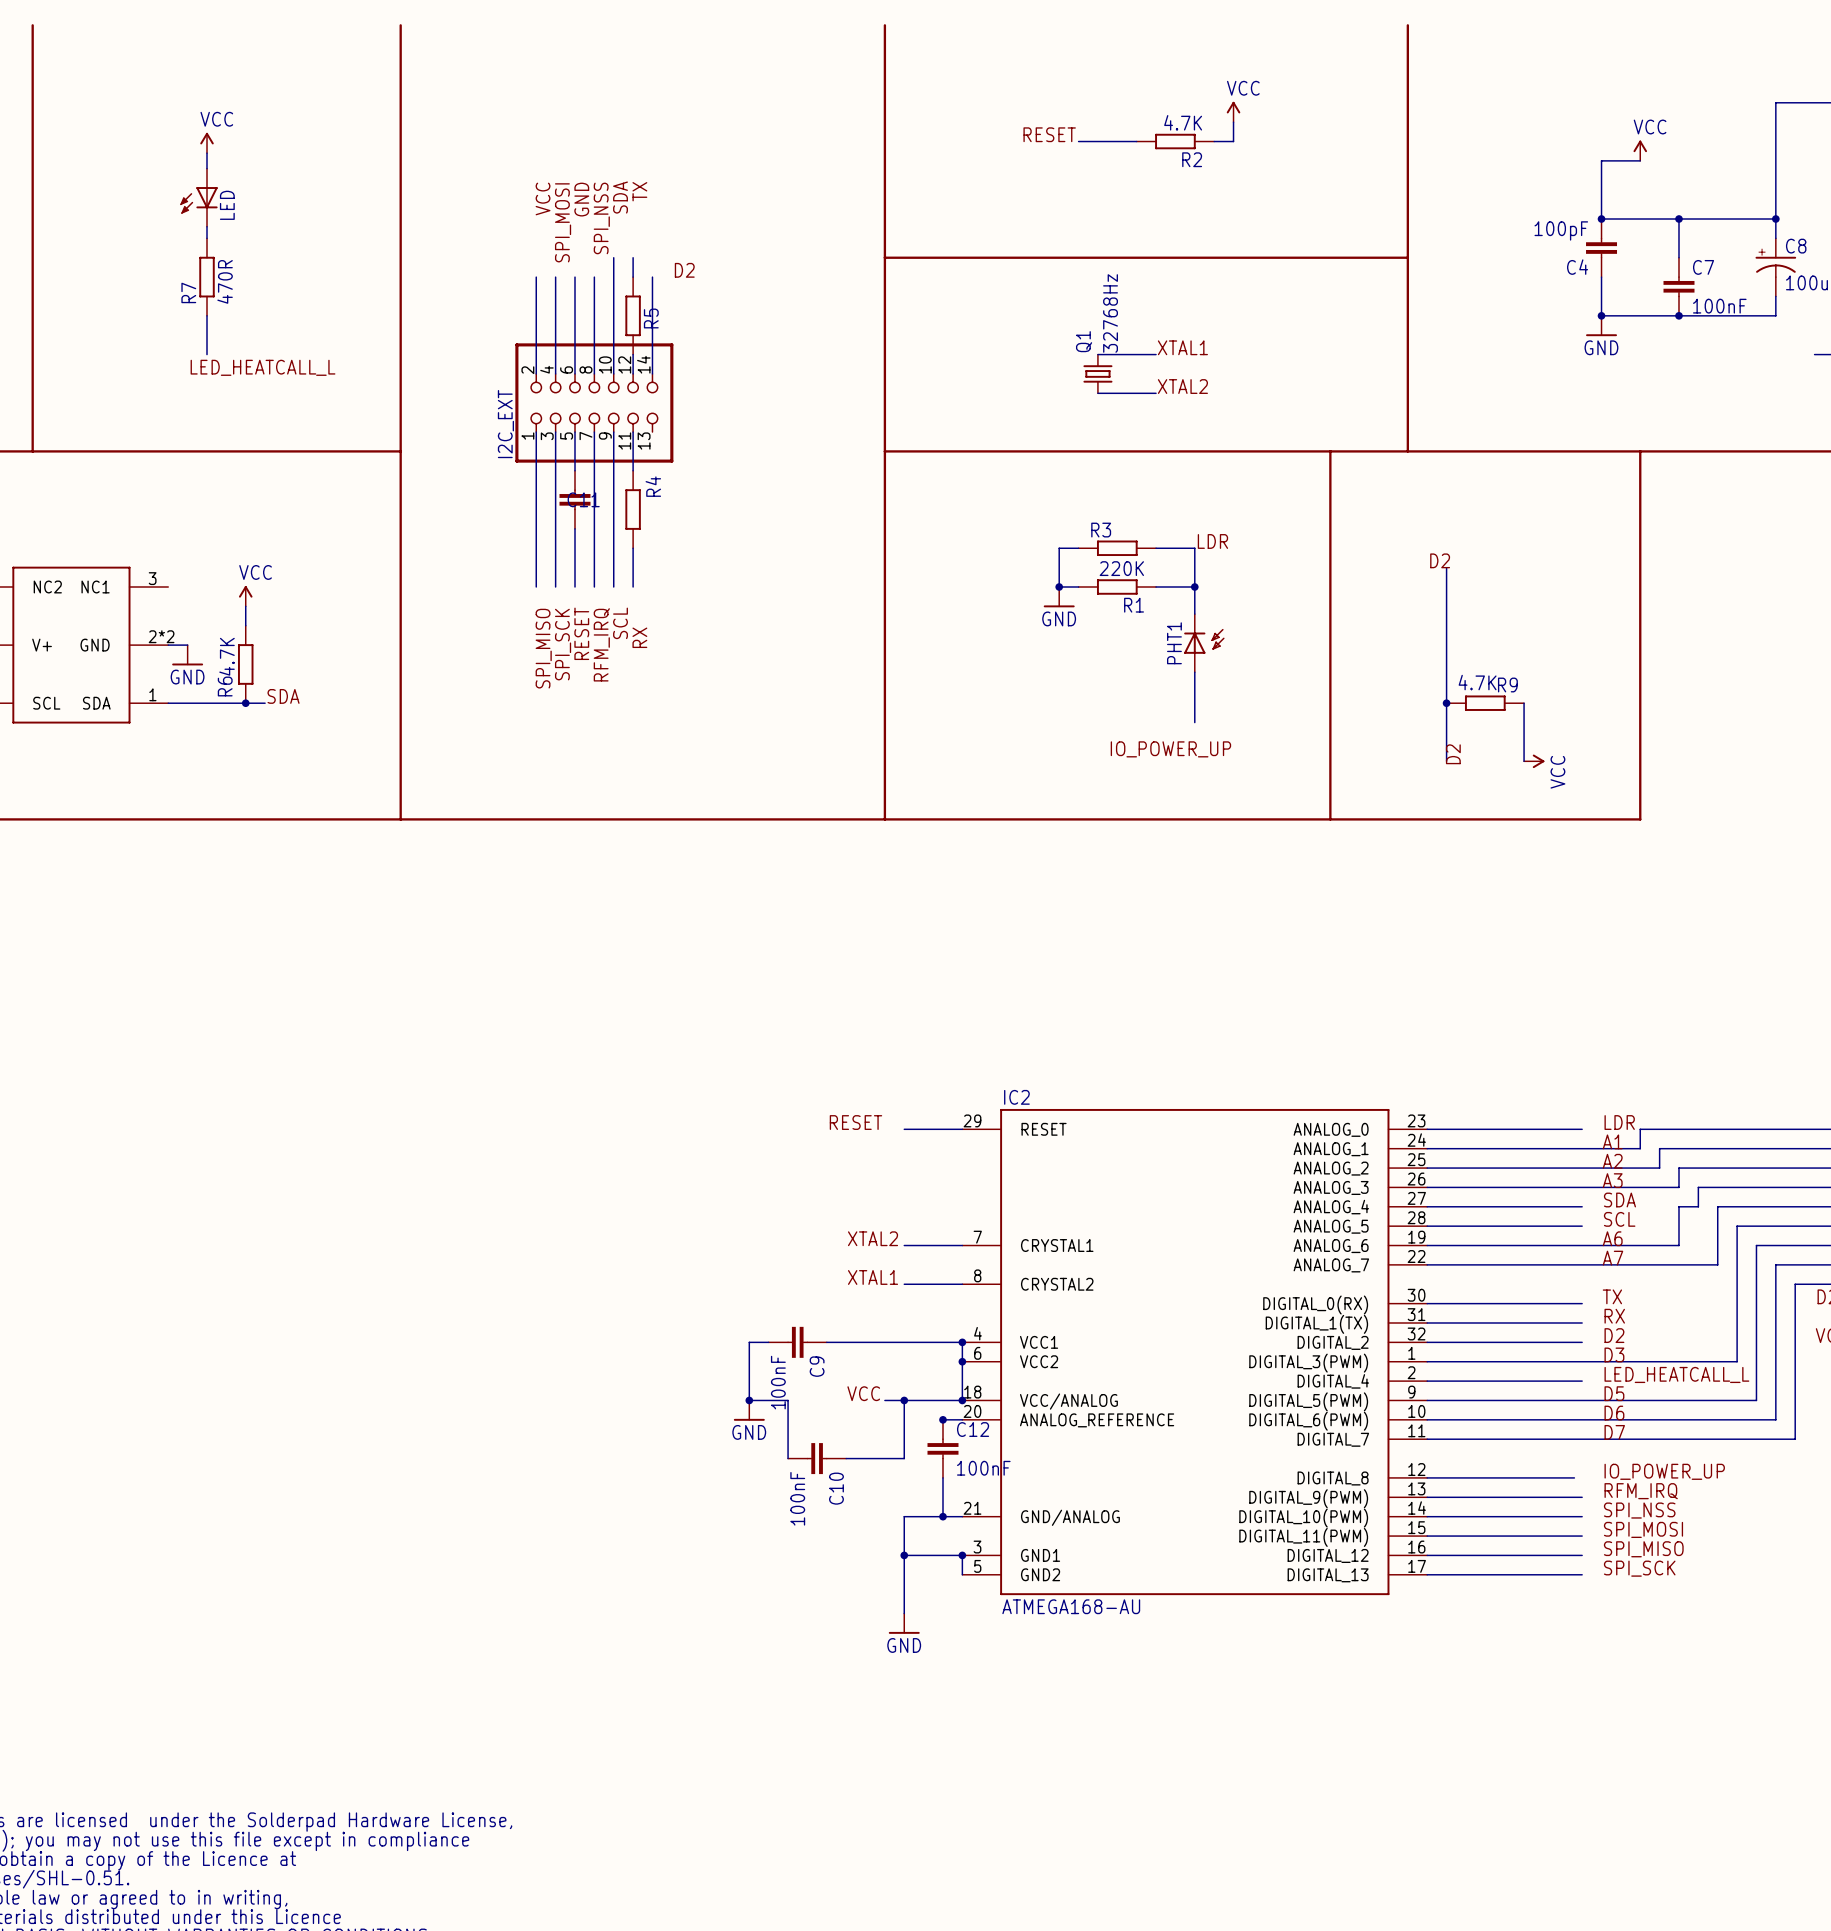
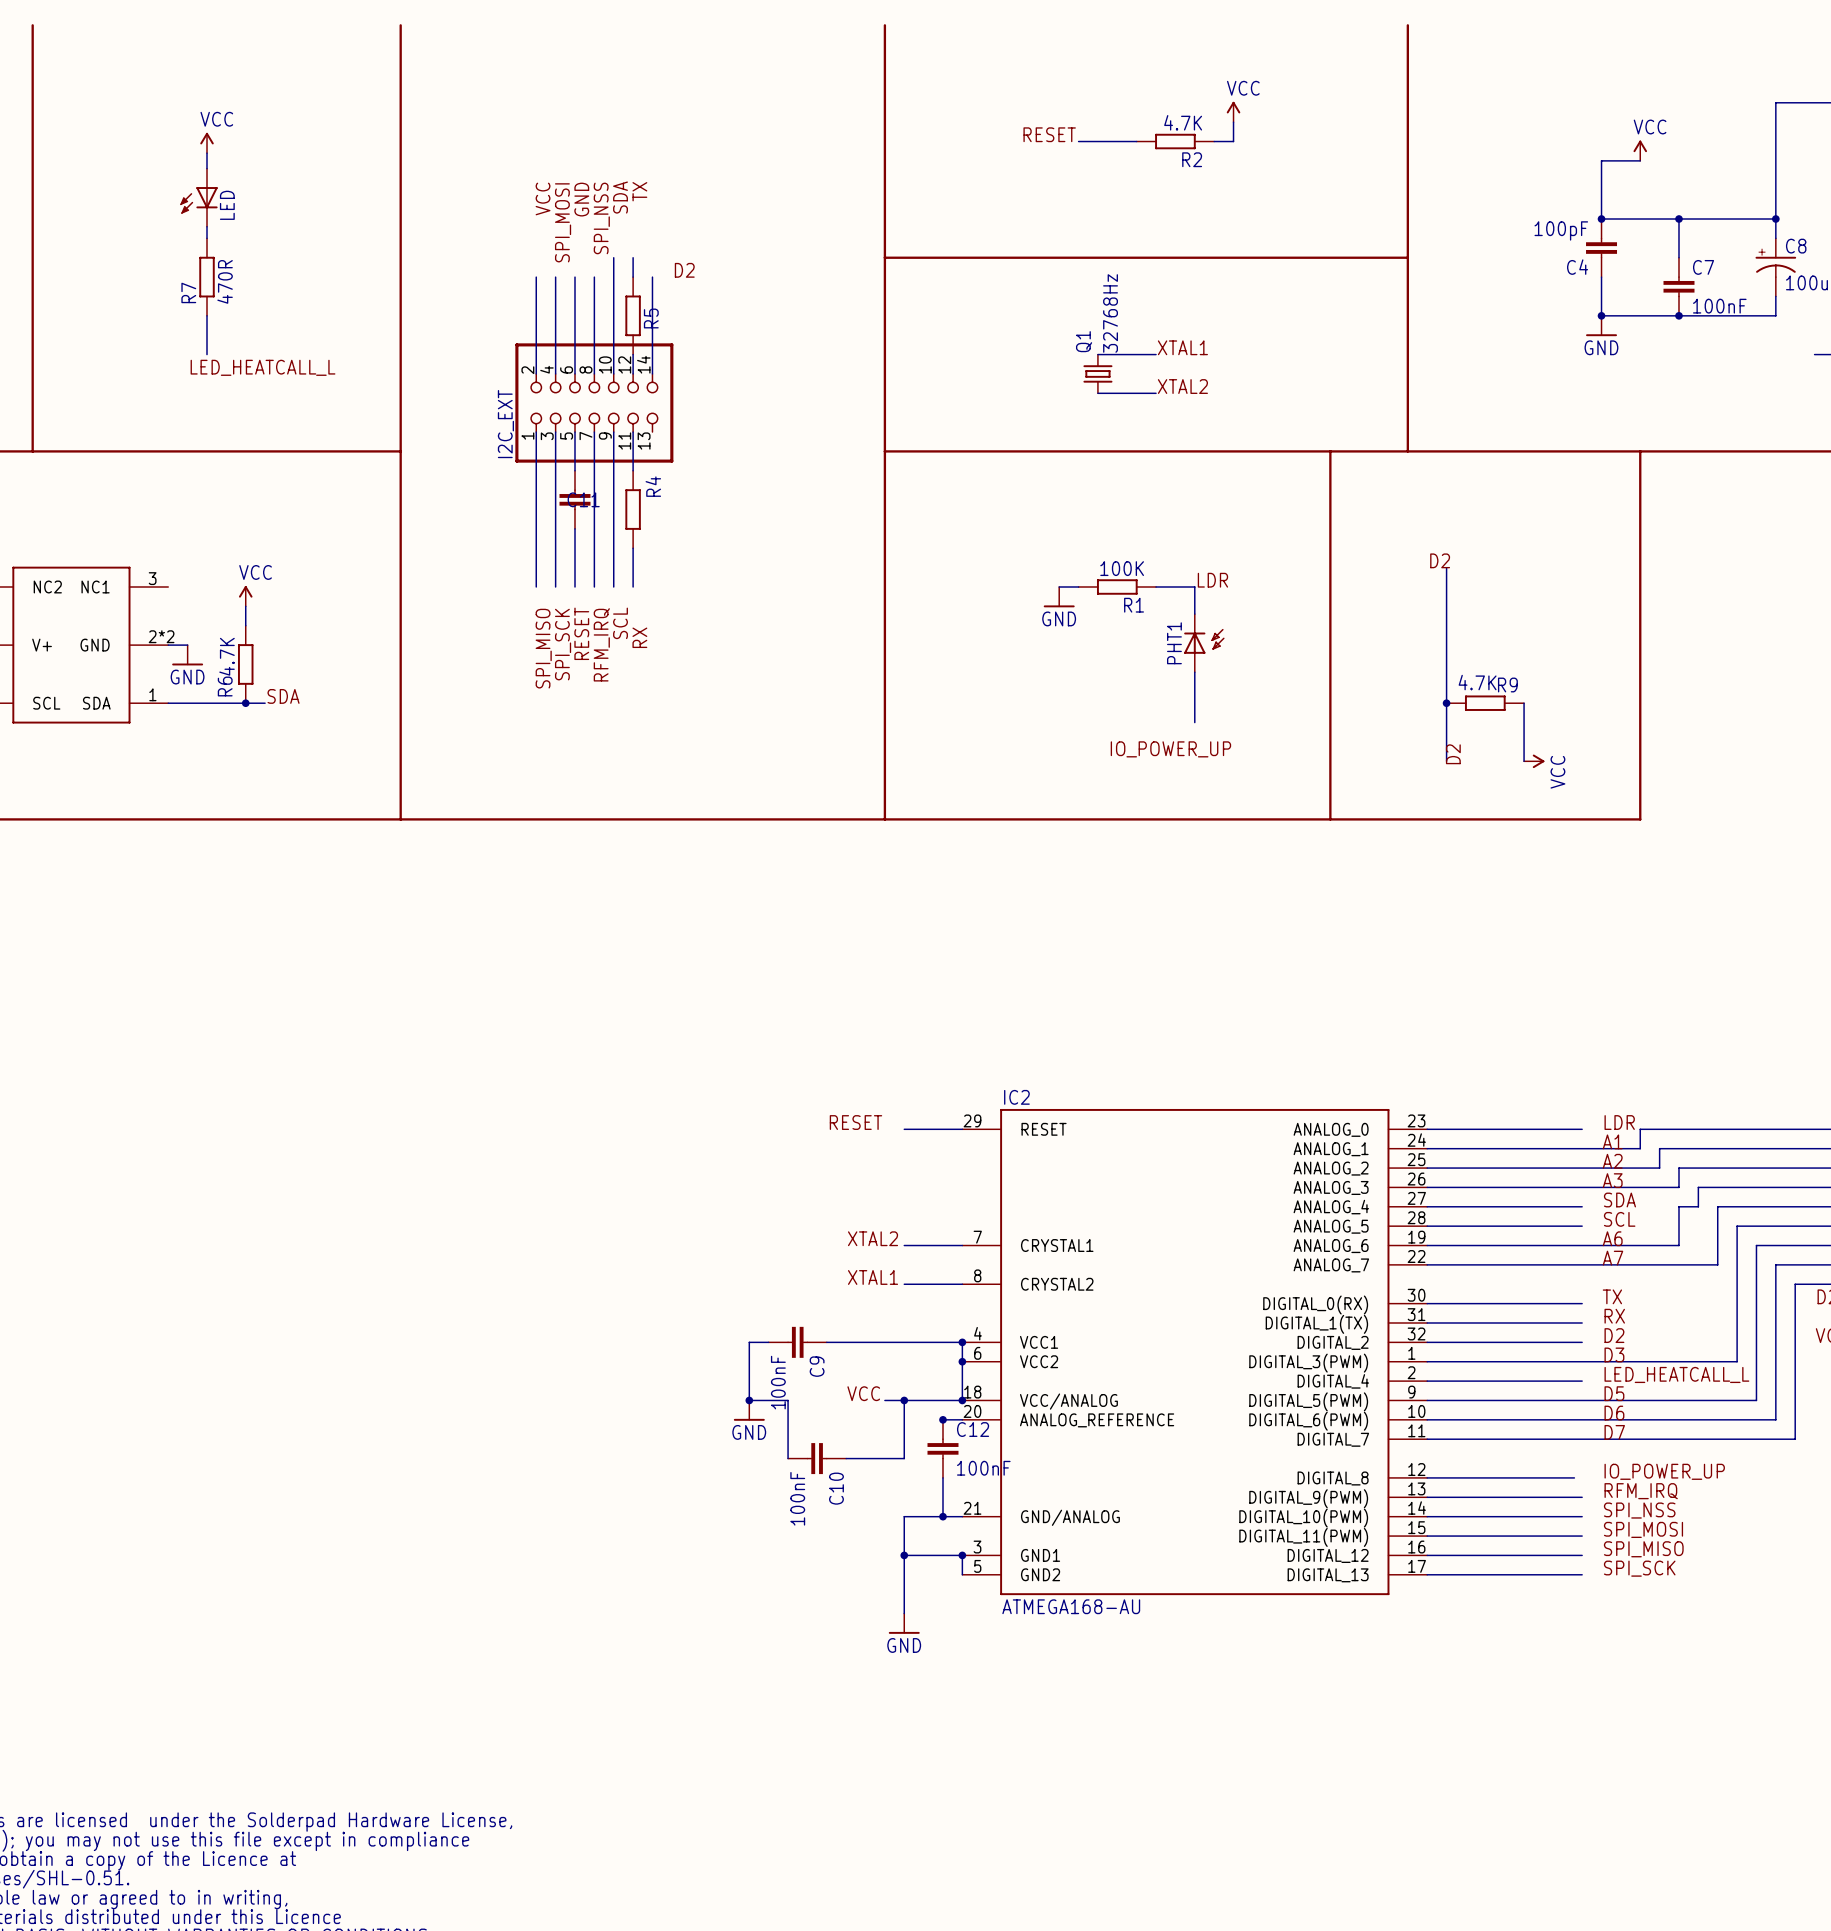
label position: LDR (1212, 541) -> LDR (1212, 580)
wire: (1078, 548) (1059, 548) (1059, 587) -> none
R3: (1117, 548) -> none
wire: (1156, 548) (1194, 548) (1194, 587) -> none
R1 value: 220K (1121, 568) -> 100K (1122, 568)
junction: (1059, 587) -> none
junction: (1194, 587) -> none

